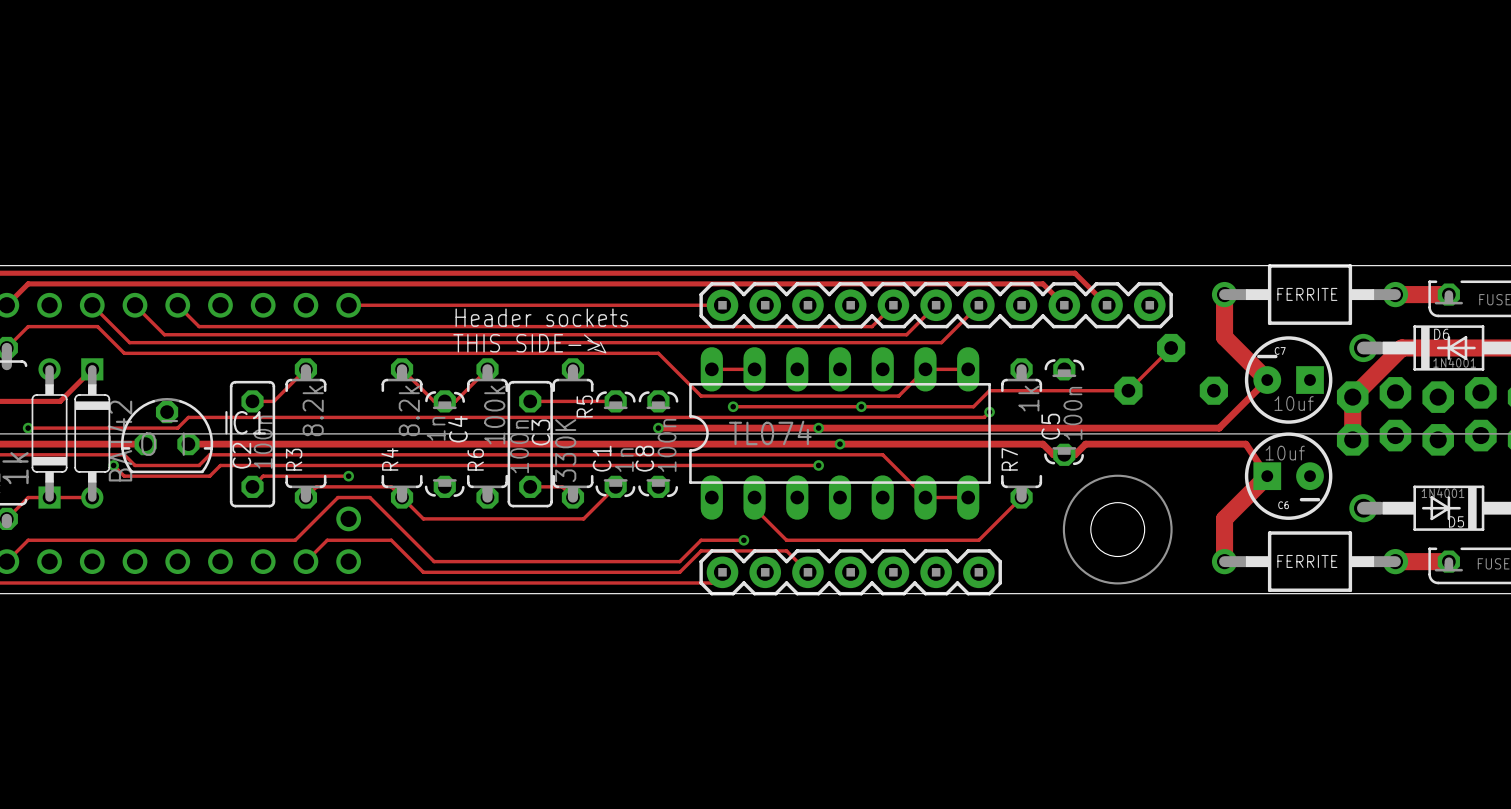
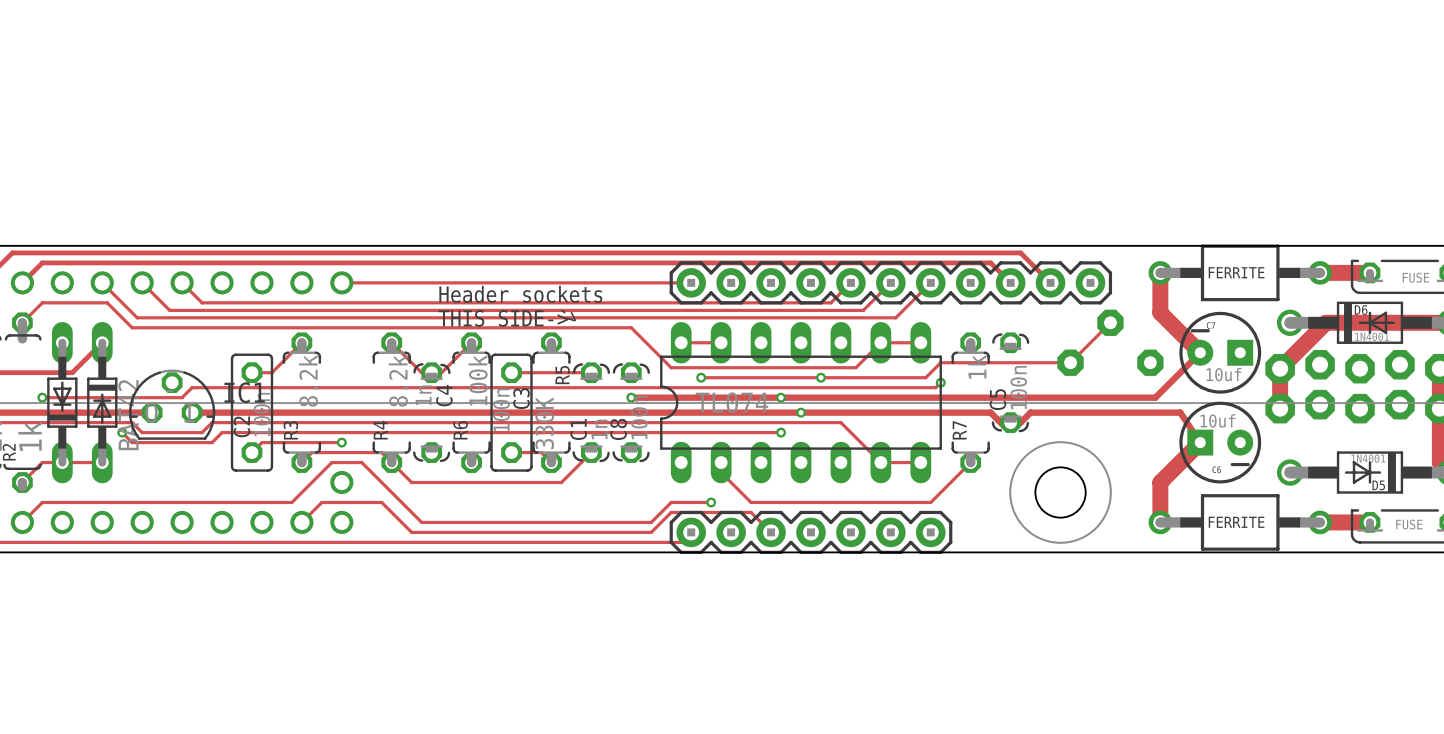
part footprint: [31, 358, 68, 509] -> [47, 322, 78, 484]
part footprint: [74, 358, 111, 509] -> [87, 322, 118, 484]

